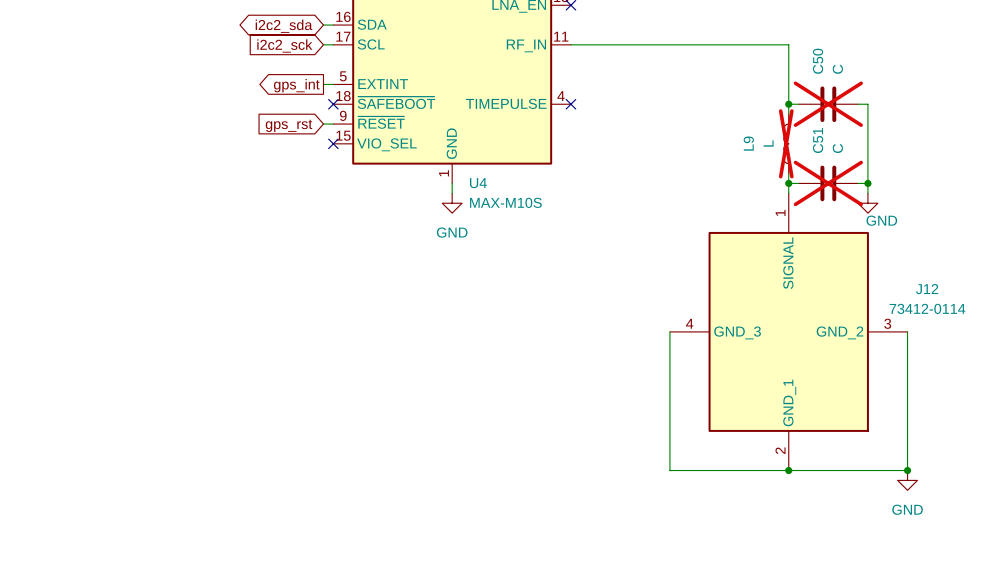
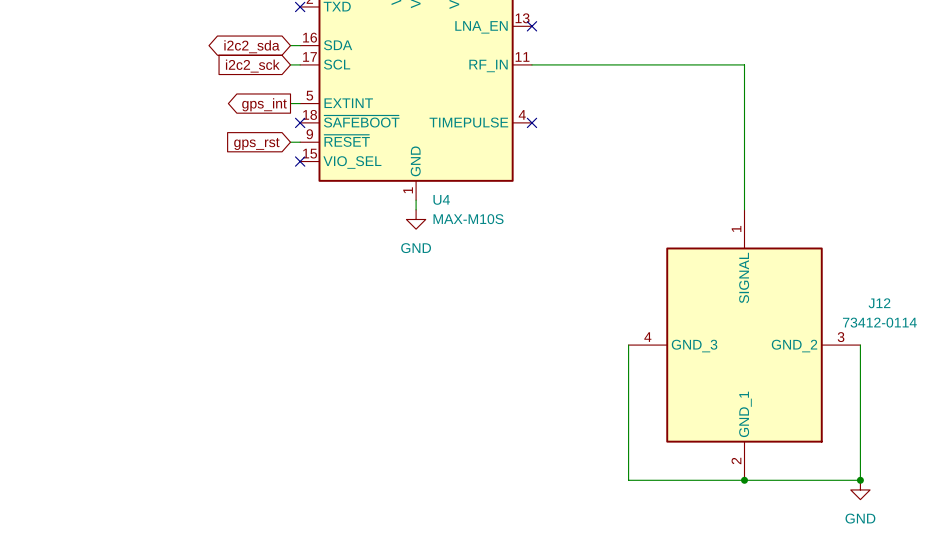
wire: (788, 104) (798, 104) -> none
junction: (788, 104) -> none
C50: C (828, 104) -> none
wire: (858, 104) (867, 104) (867, 193) -> none
L9: L (786, 143) -> none
wire: (788, 183) (798, 183) -> none
junction: (788, 183) -> none
C51: C (828, 183) -> none
wire: (858, 183) (867, 183) -> none
junction: (867, 183) -> none
power symbol: GND (867, 203) -> none

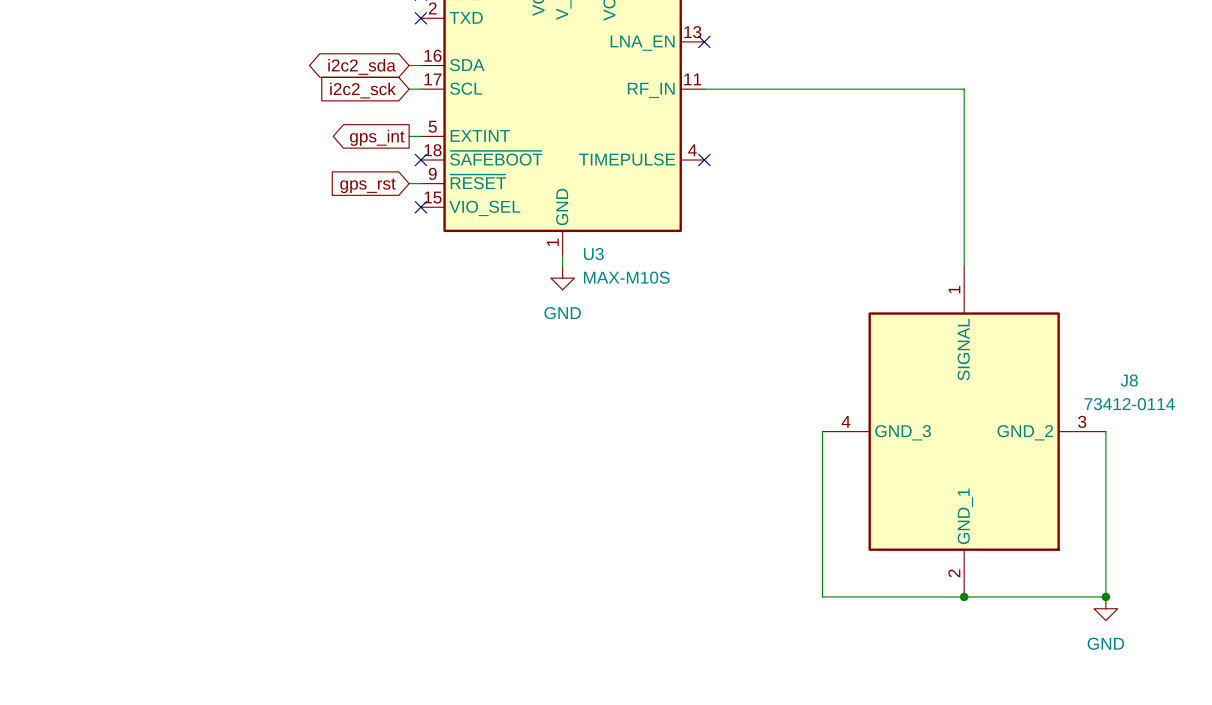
U4 name: U4 (441, 199) -> U3 (593, 254)
J12 name: J12 (879, 303) -> J8 (1129, 380)

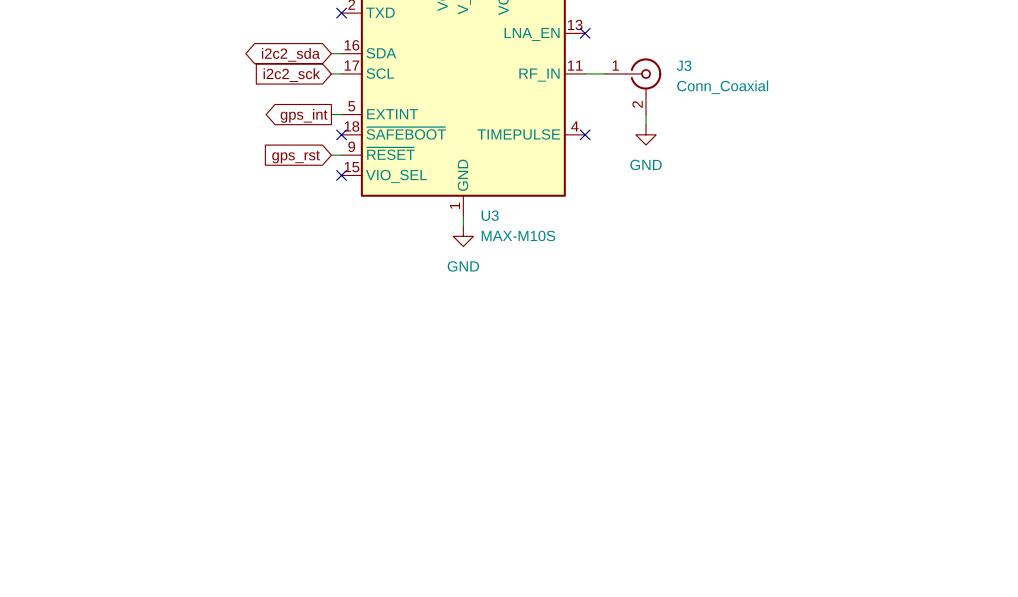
wire: (727, 89) (964, 89) (964, 266) -> none
J3: none -> Conn_Coaxial (633, 86)
wire: none -> (646, 114) (646, 124)
power symbol: none -> GND (646, 134)
wire: (822, 431) (822, 596) (1105, 596) (1105, 431) -> none
J8: 73412-0114 (964, 431) -> none
junction: (964, 596) -> none
junction: (1105, 596) -> none
power symbol: GND (1105, 608) -> none

